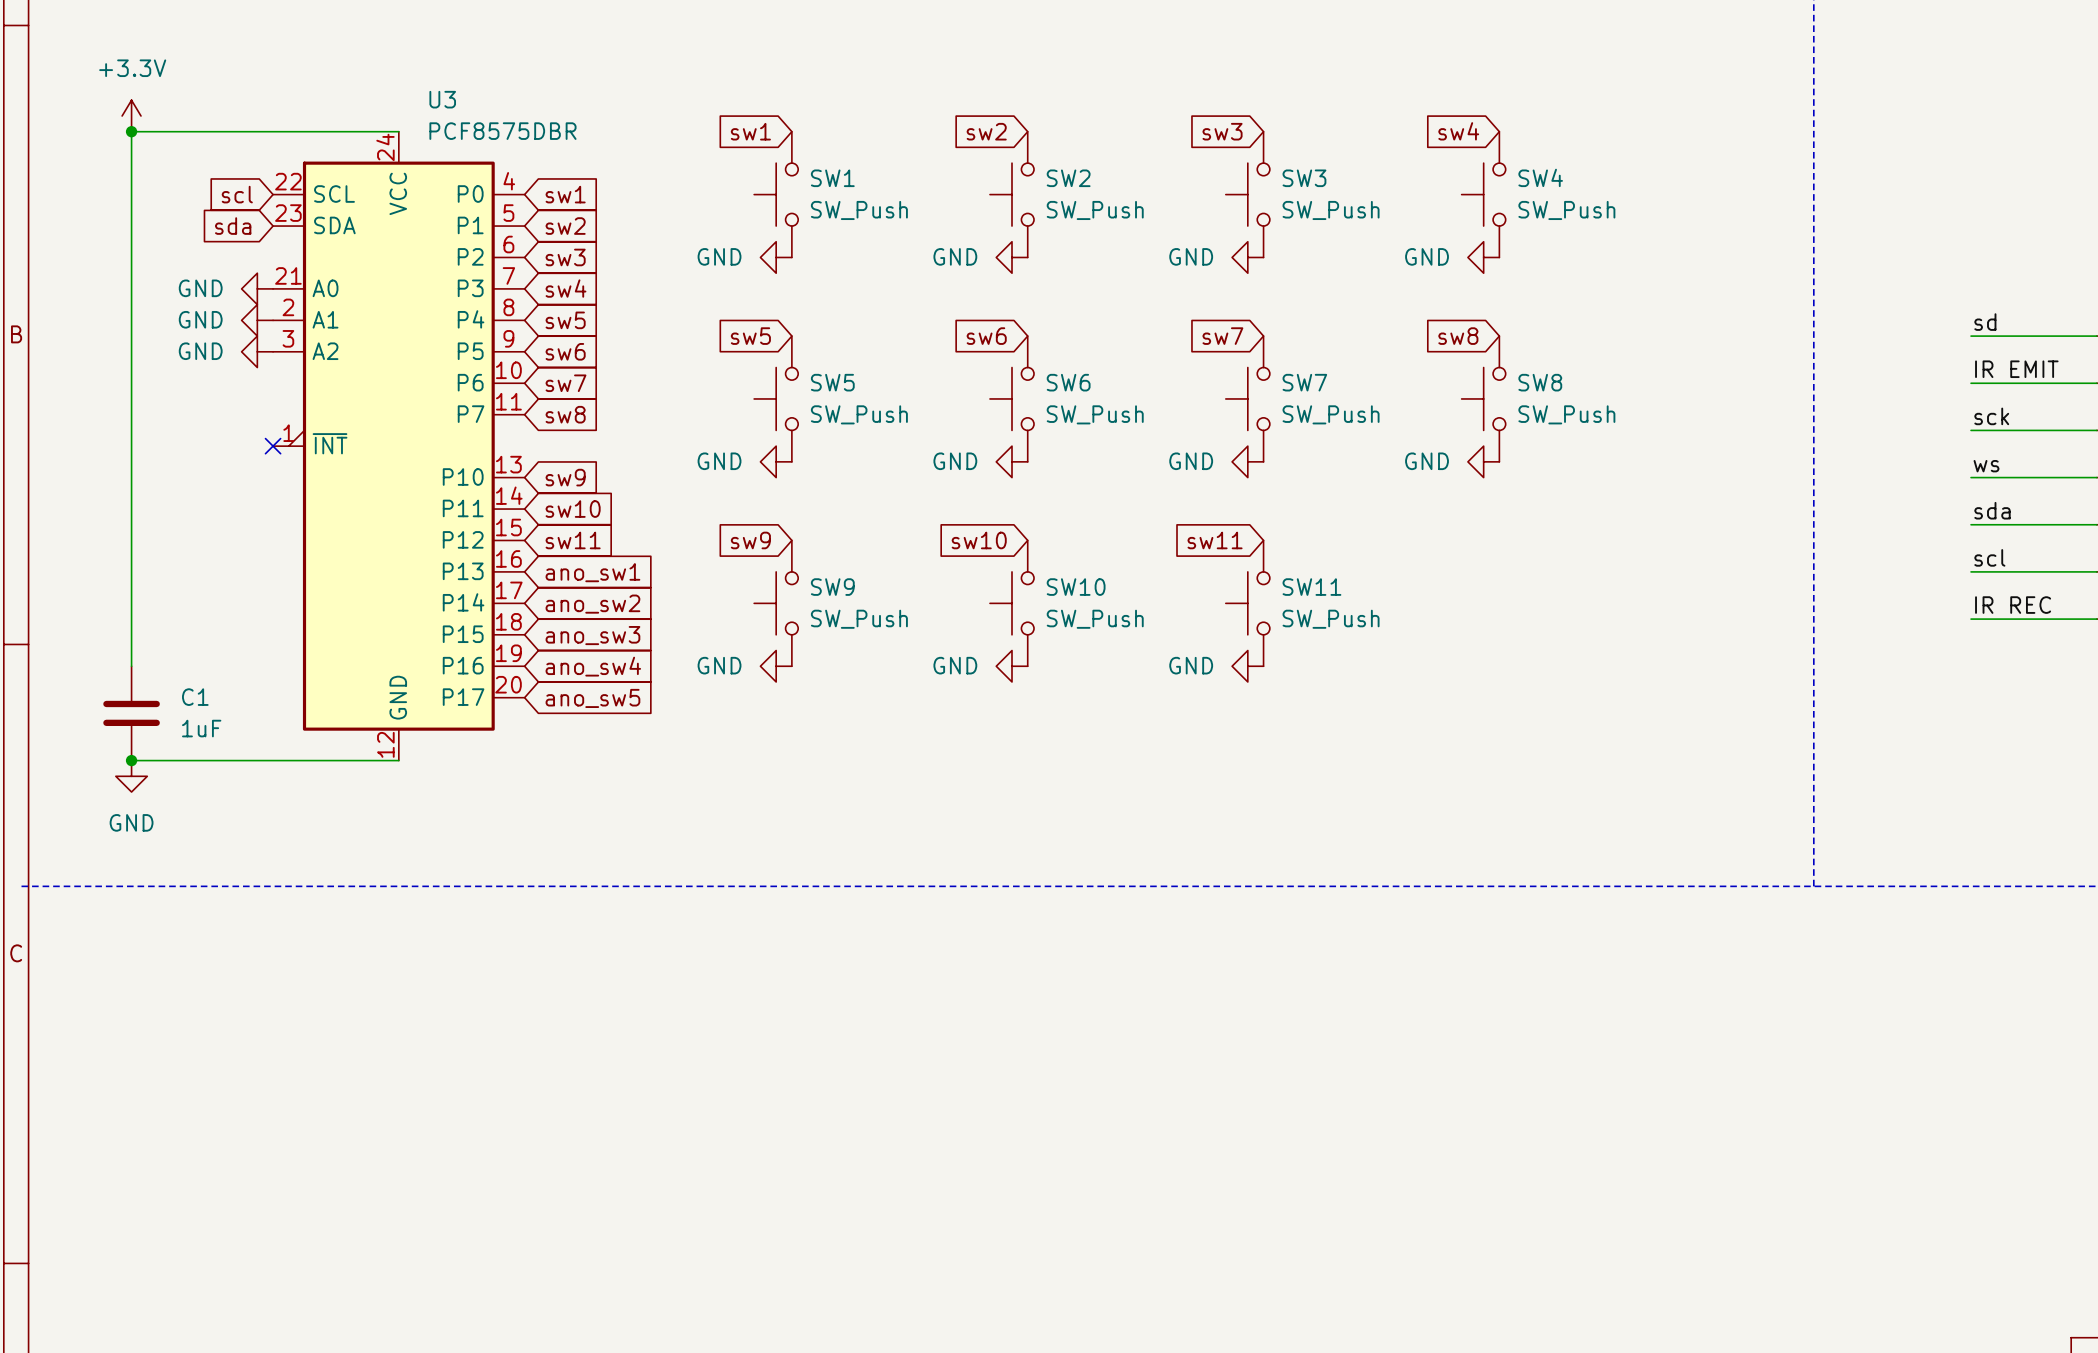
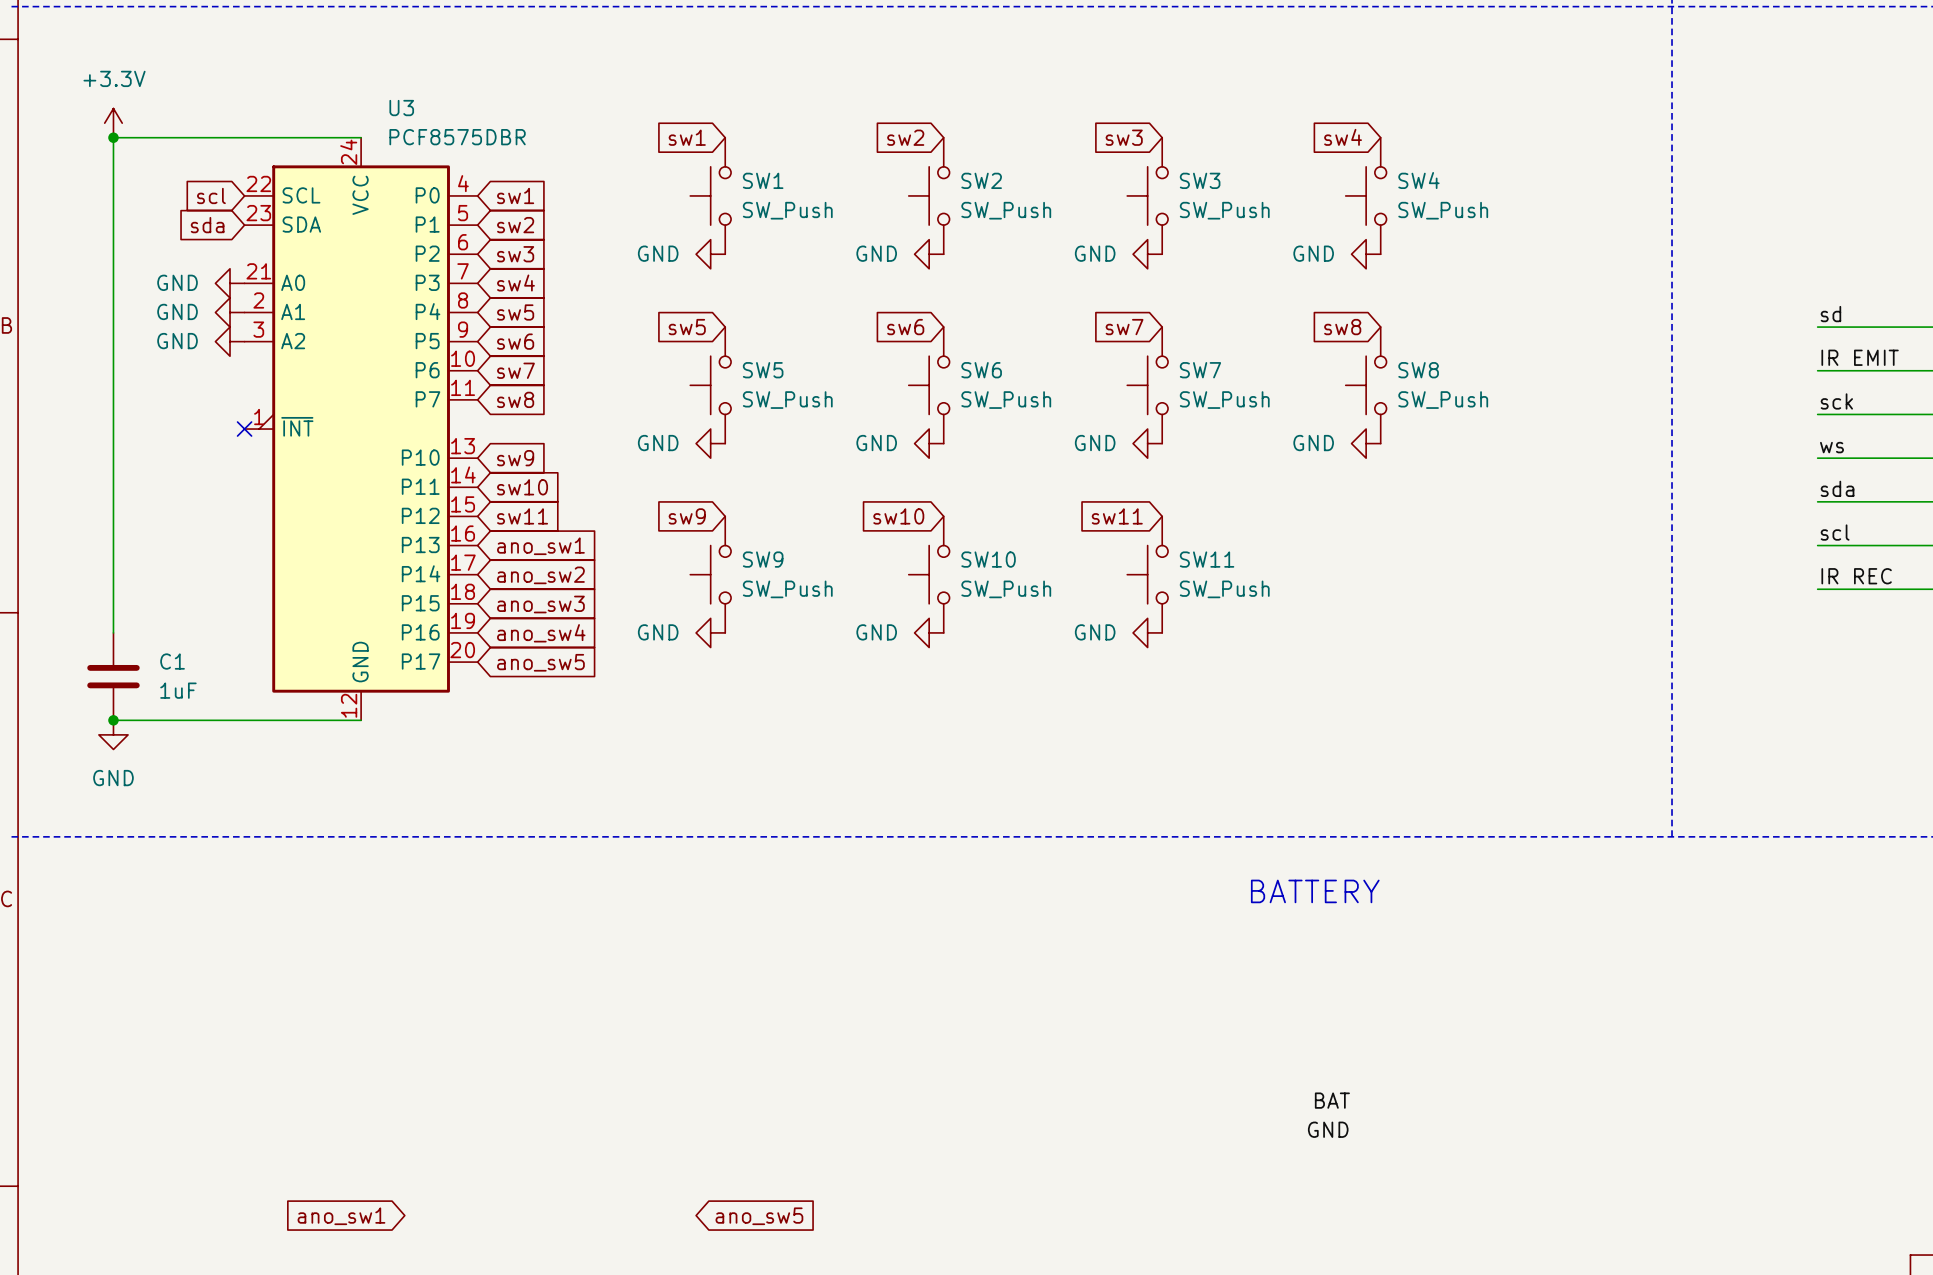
text: none -> BATTERY (1315, 891)
label: none -> BAT (1332, 1100)
label: none -> GND (1328, 1129)
global label: none -> ano_sw1 (341, 1216)
global label: none -> ano_sw5 (759, 1216)

